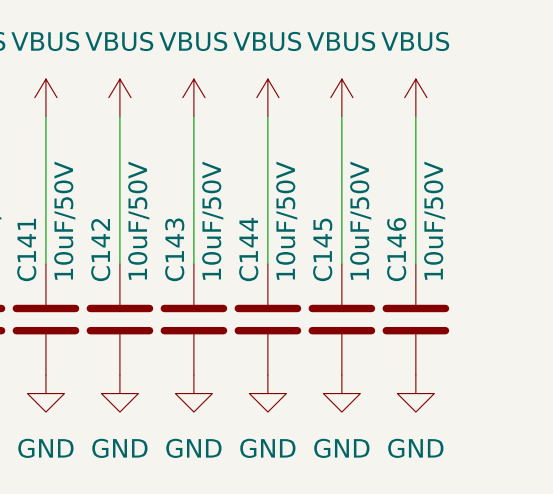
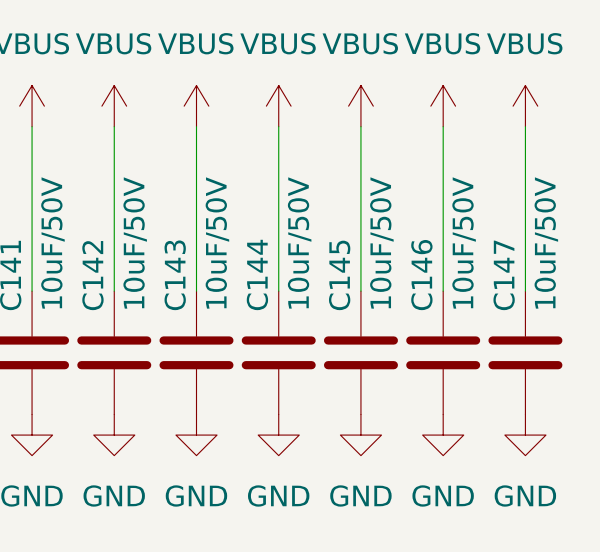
power symbol: none -> VBUS (525, 106)
wire: none -> (525, 126) (525, 291)
C147: none -> 10uF/50V (525, 352)
power symbol: none -> GND (525, 435)

